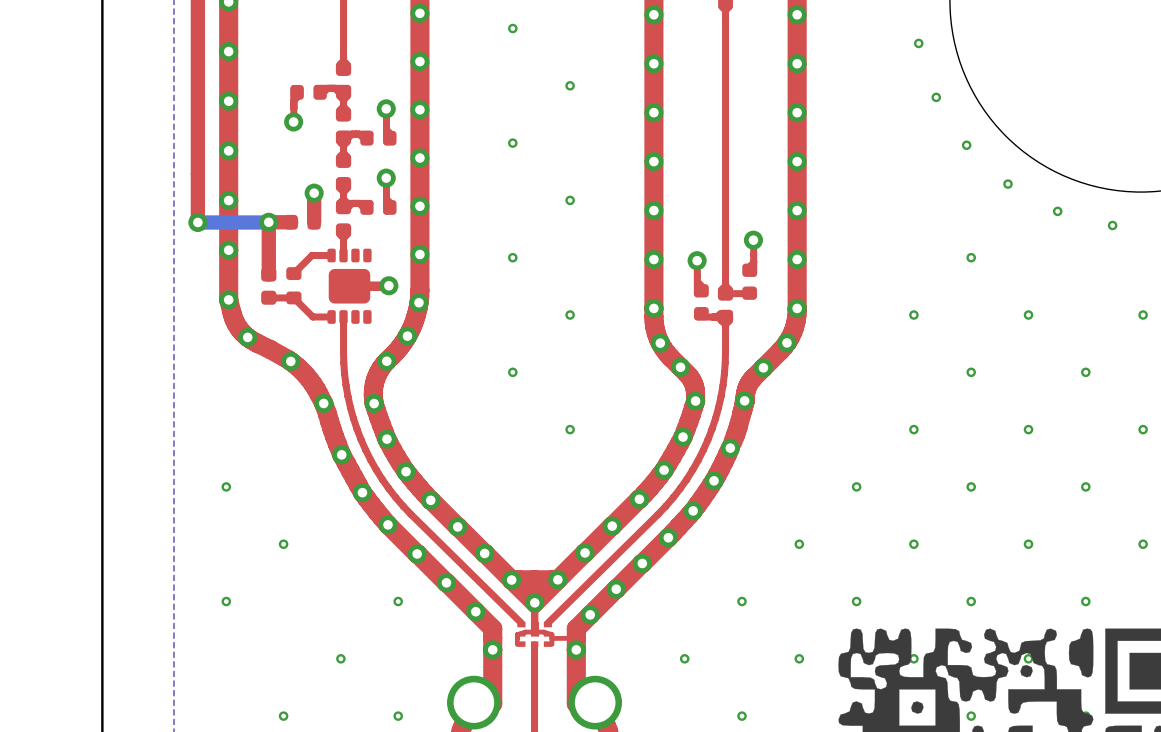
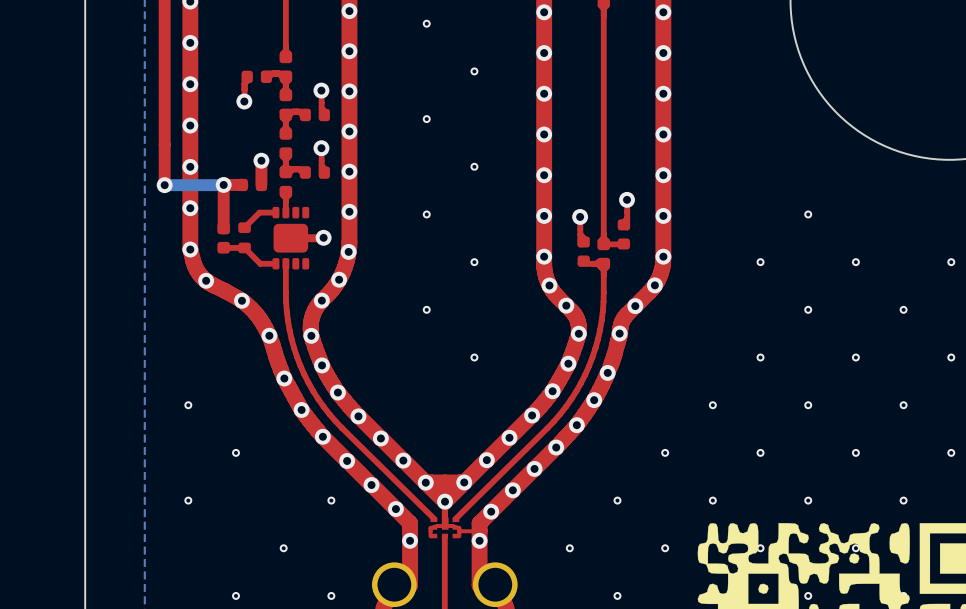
via: (918, 43) -> none
via: (936, 97) -> none
via: (966, 145) -> none
via: (1007, 184) -> none
via: (1057, 211) -> none
via: (1112, 225) -> none

